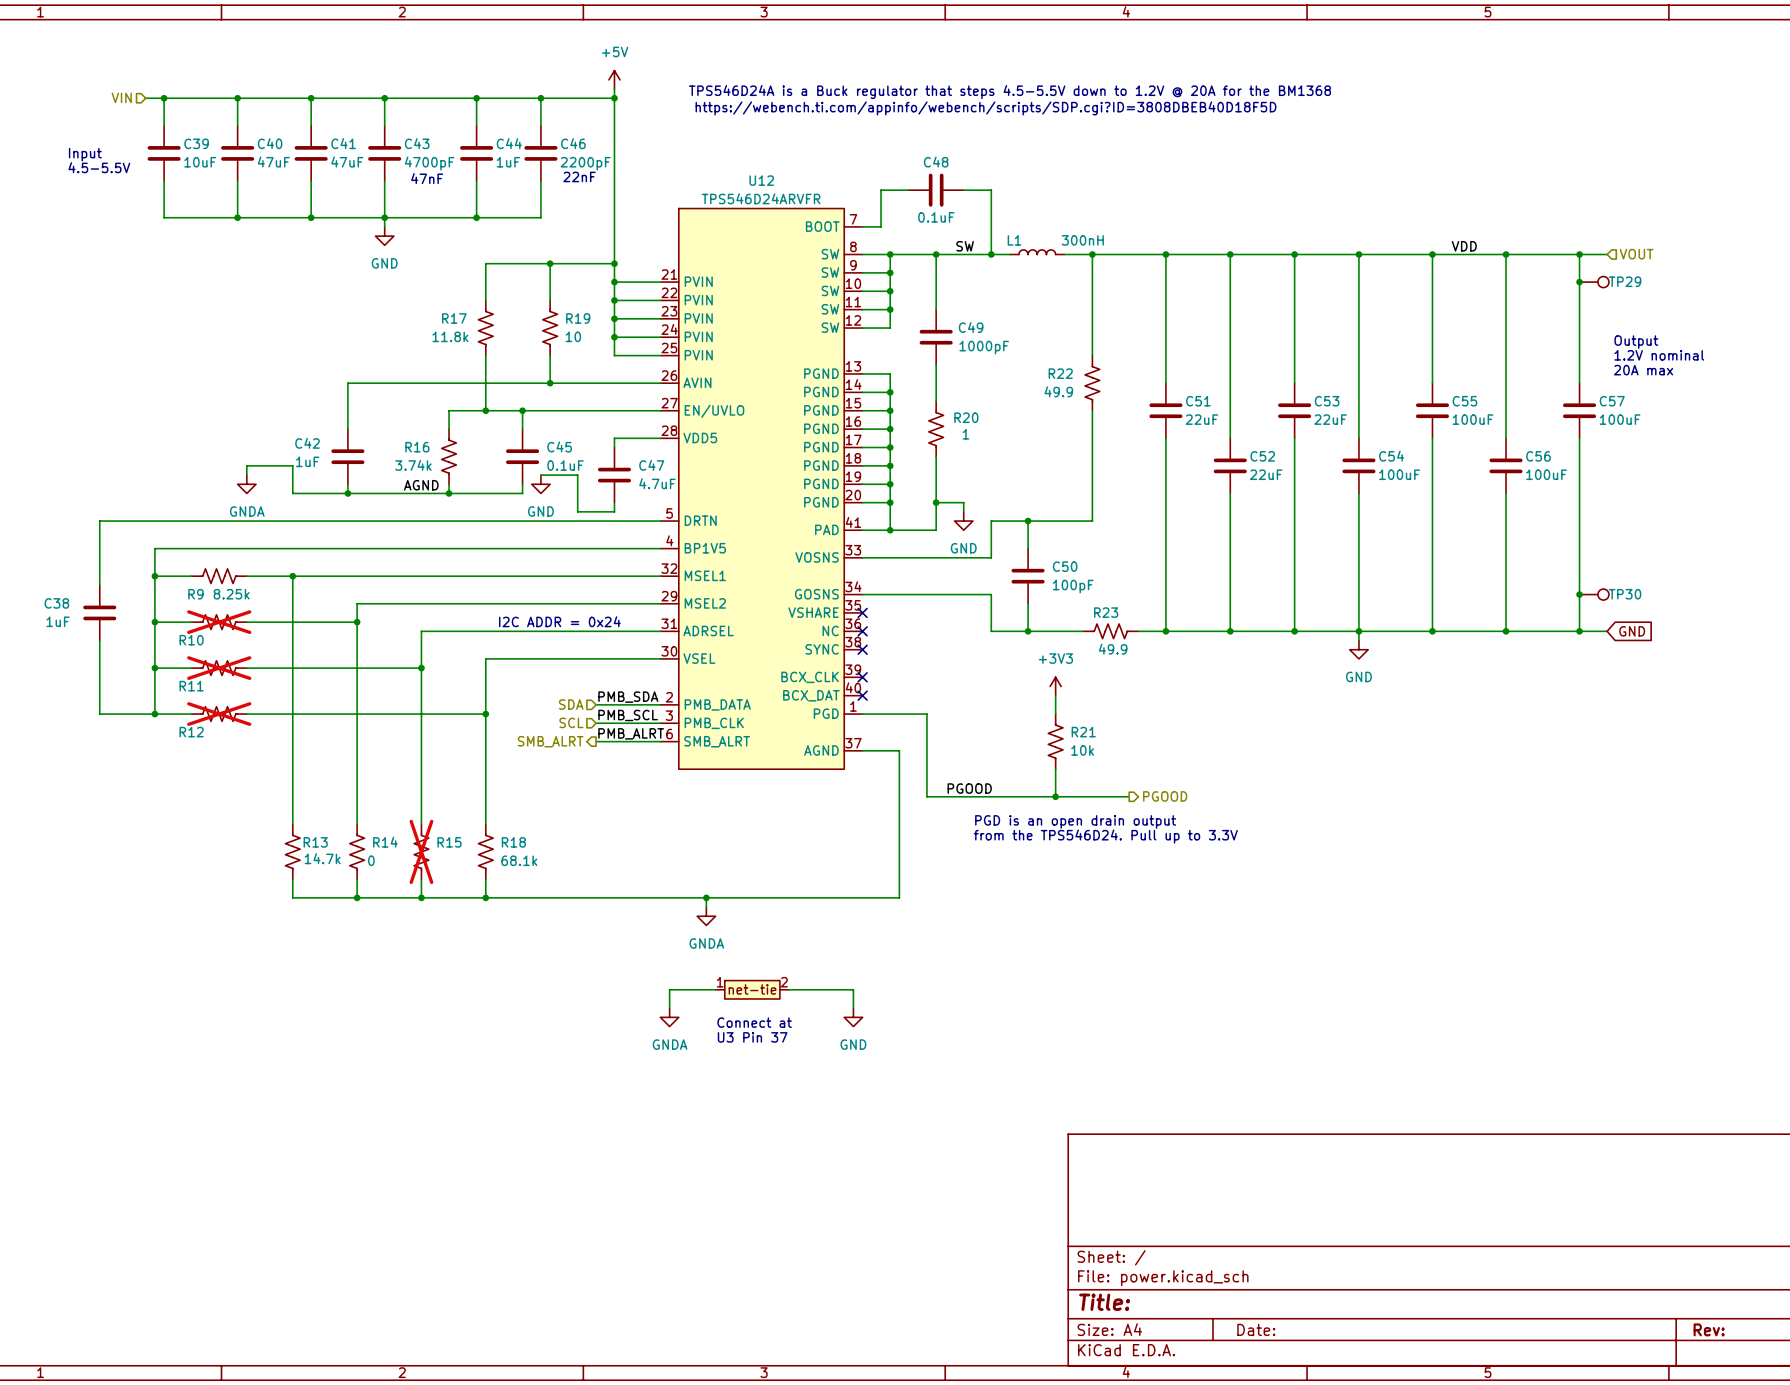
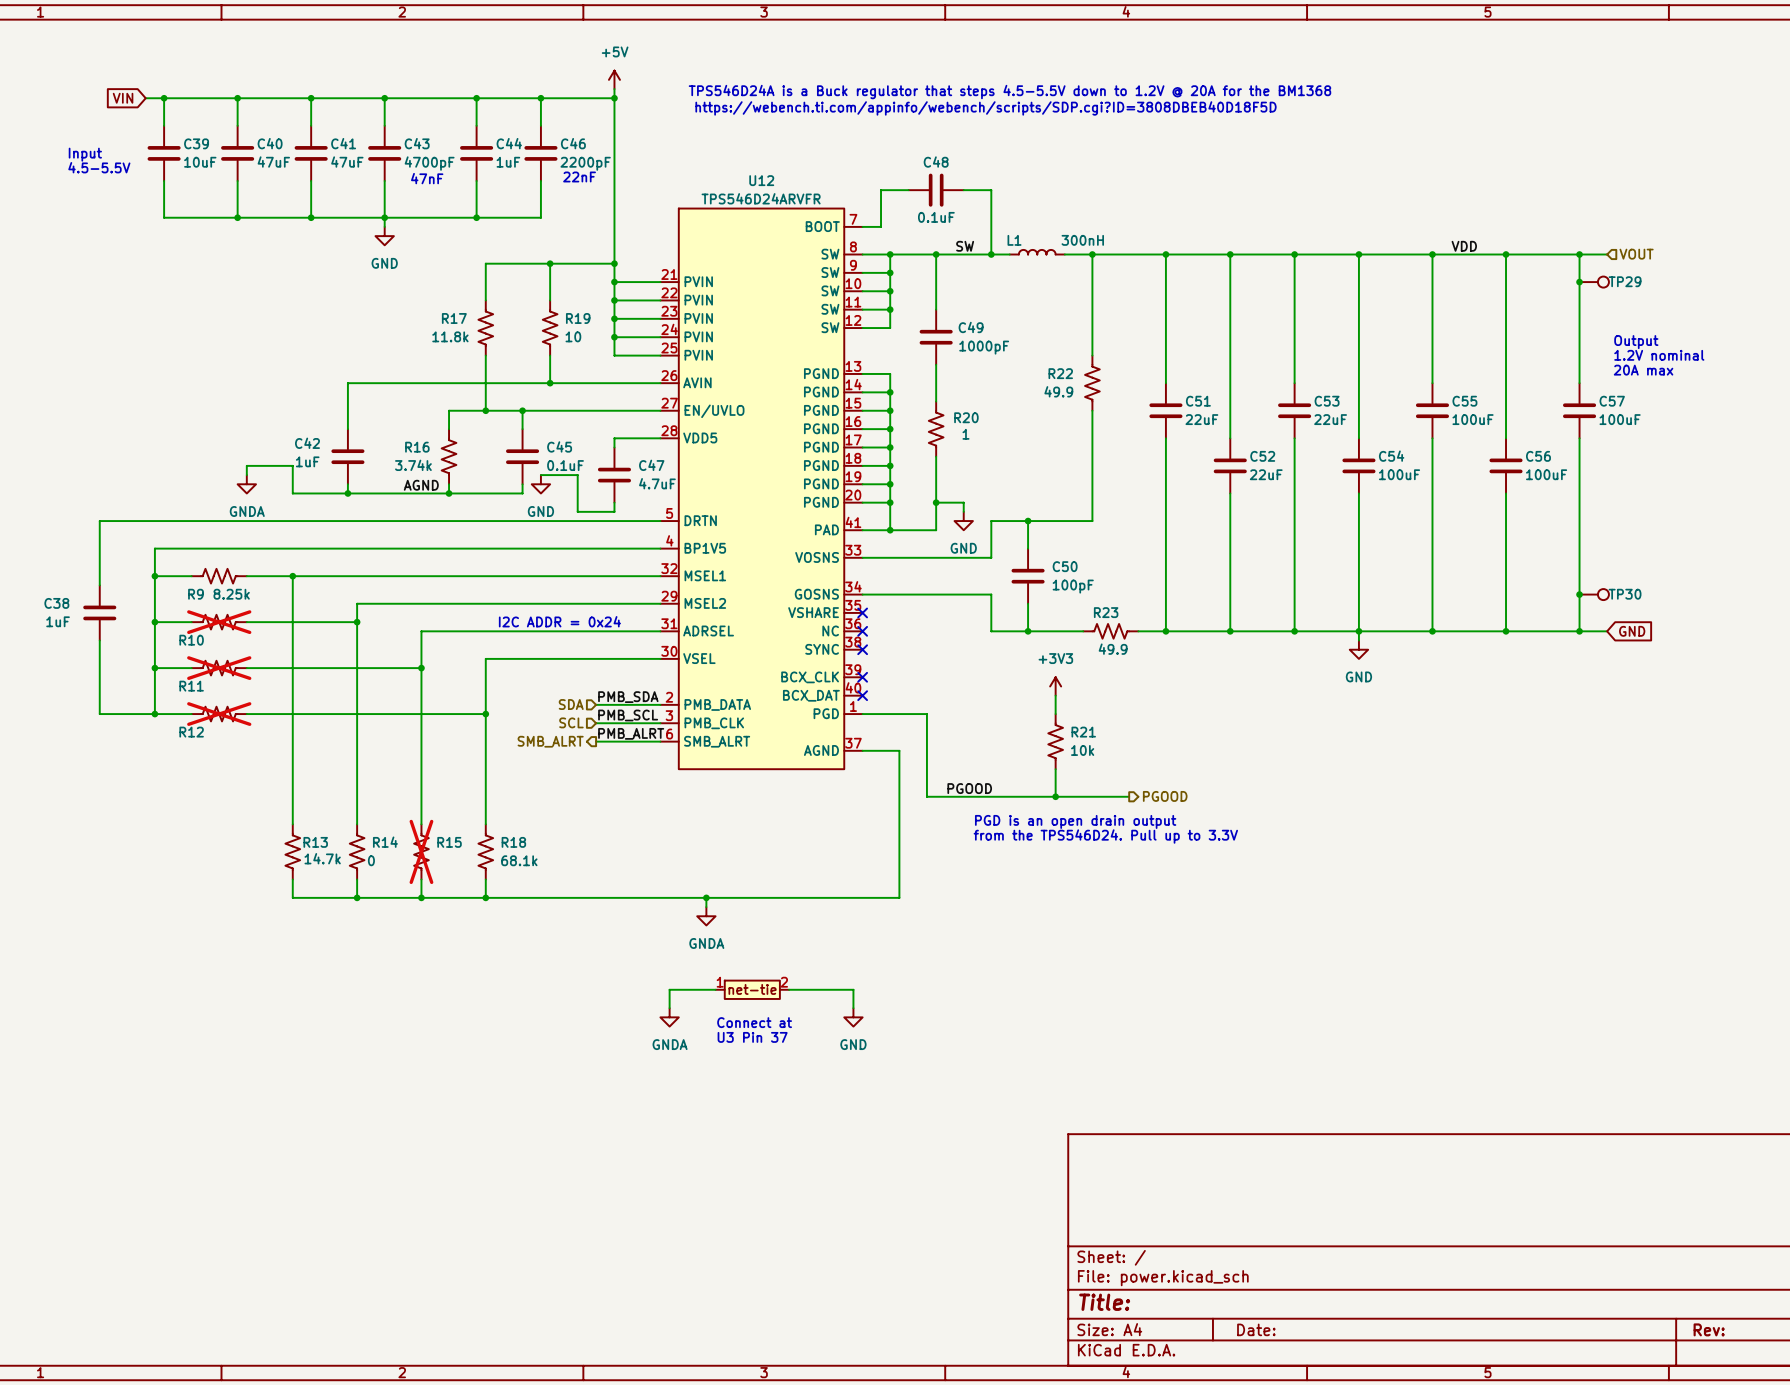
hierarchical label: VIN (121, 97) -> none
global label: none -> VIN (123, 98)

